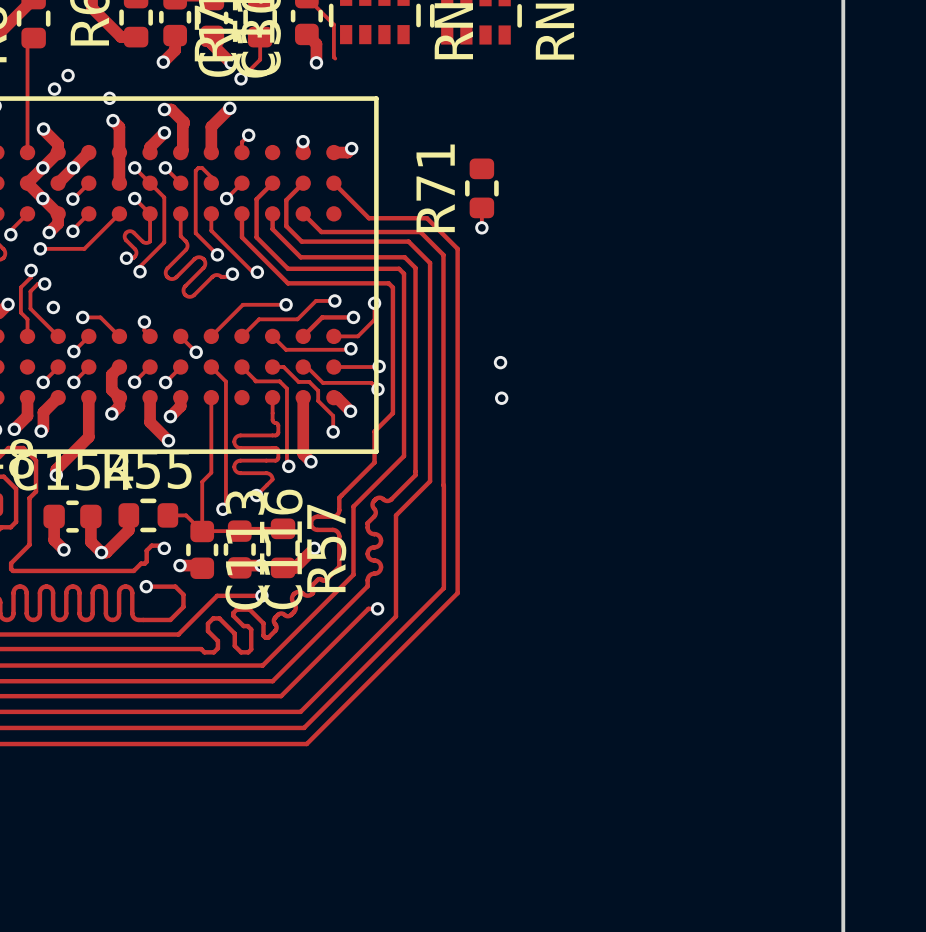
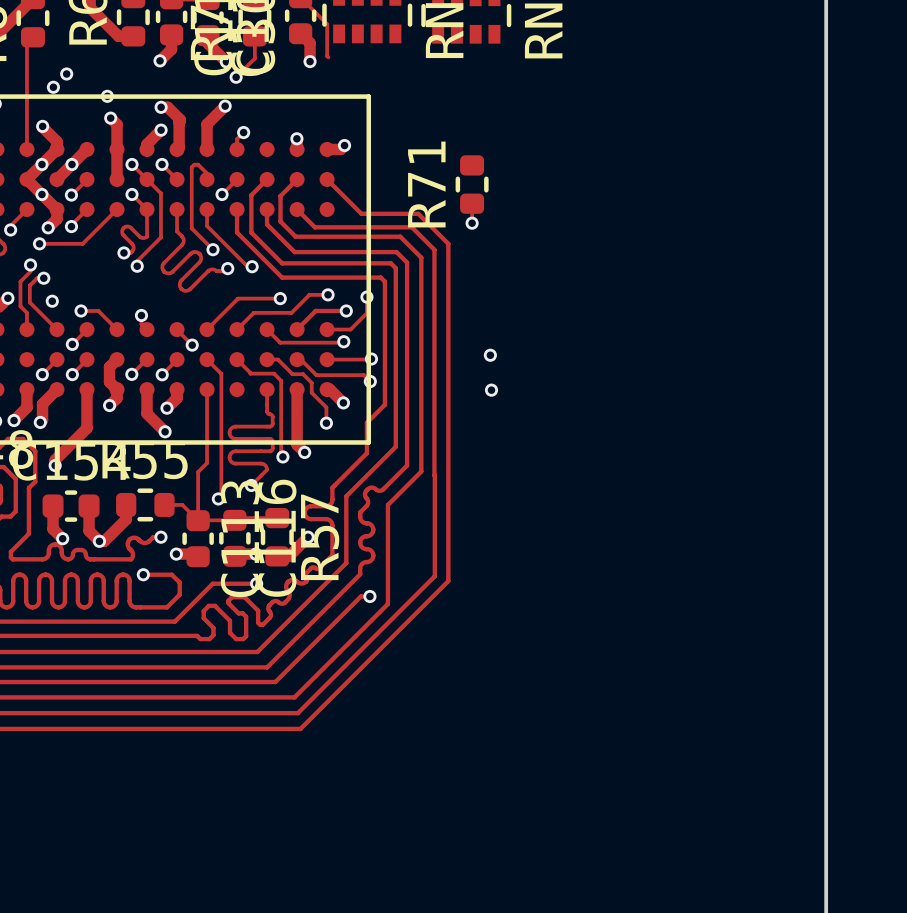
track: (164, 548) (161, 545) (151, 545) (146, 550) (146, 561) (141, 563) (133, 570) -> (160, 537) (153, 537) (145, 542) (135, 537) (130, 539) (127, 544) (132, 553) (131, 559)
track: (43, 570) (92, 570) -> (42, 559) (47, 556) (50, 546) (55, 544) (60, 546) (62, 555) (65, 558) (71, 558) (75, 550) (81, 549) (90, 559)

